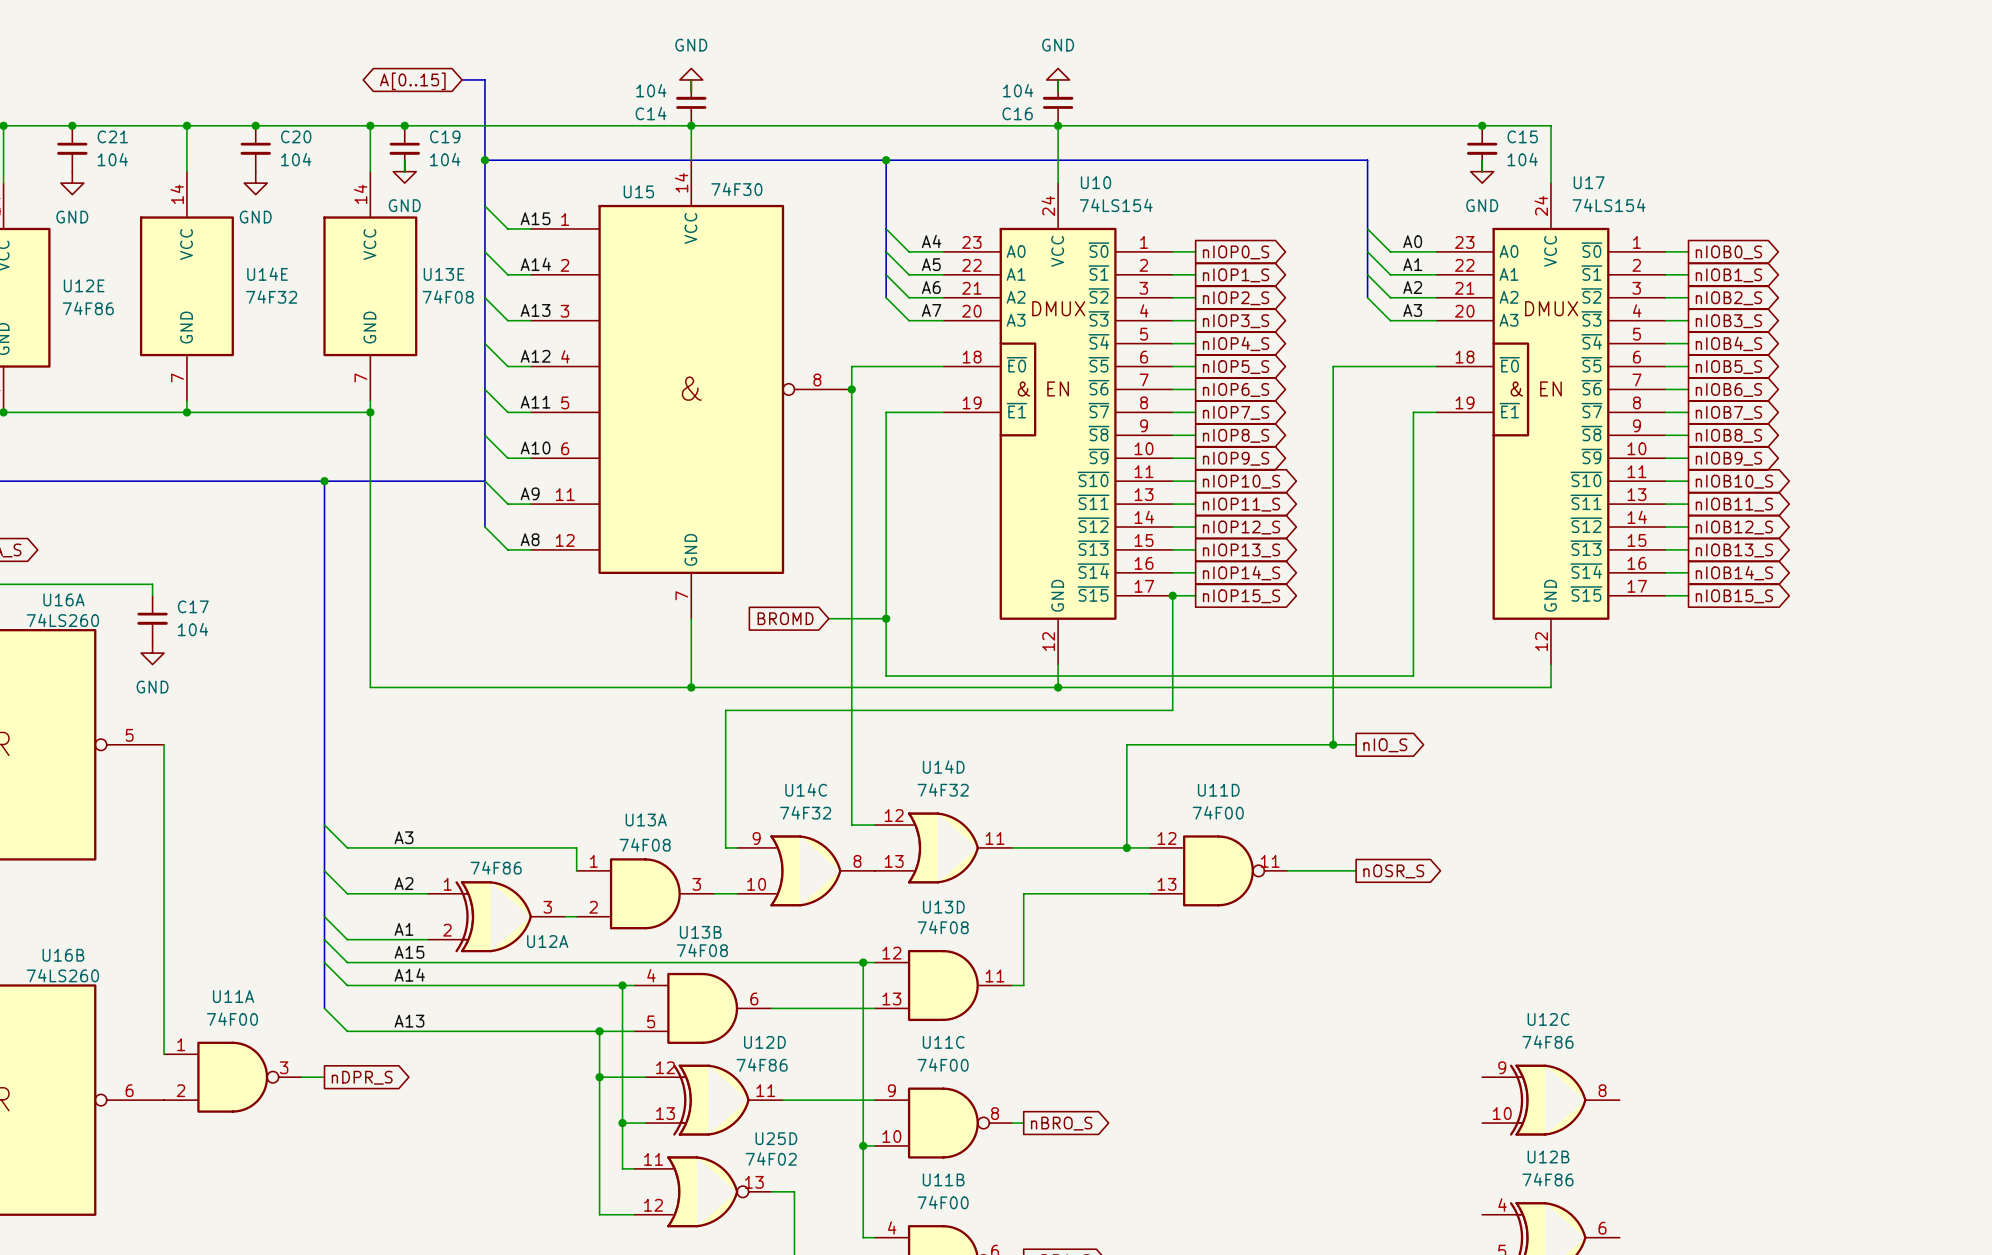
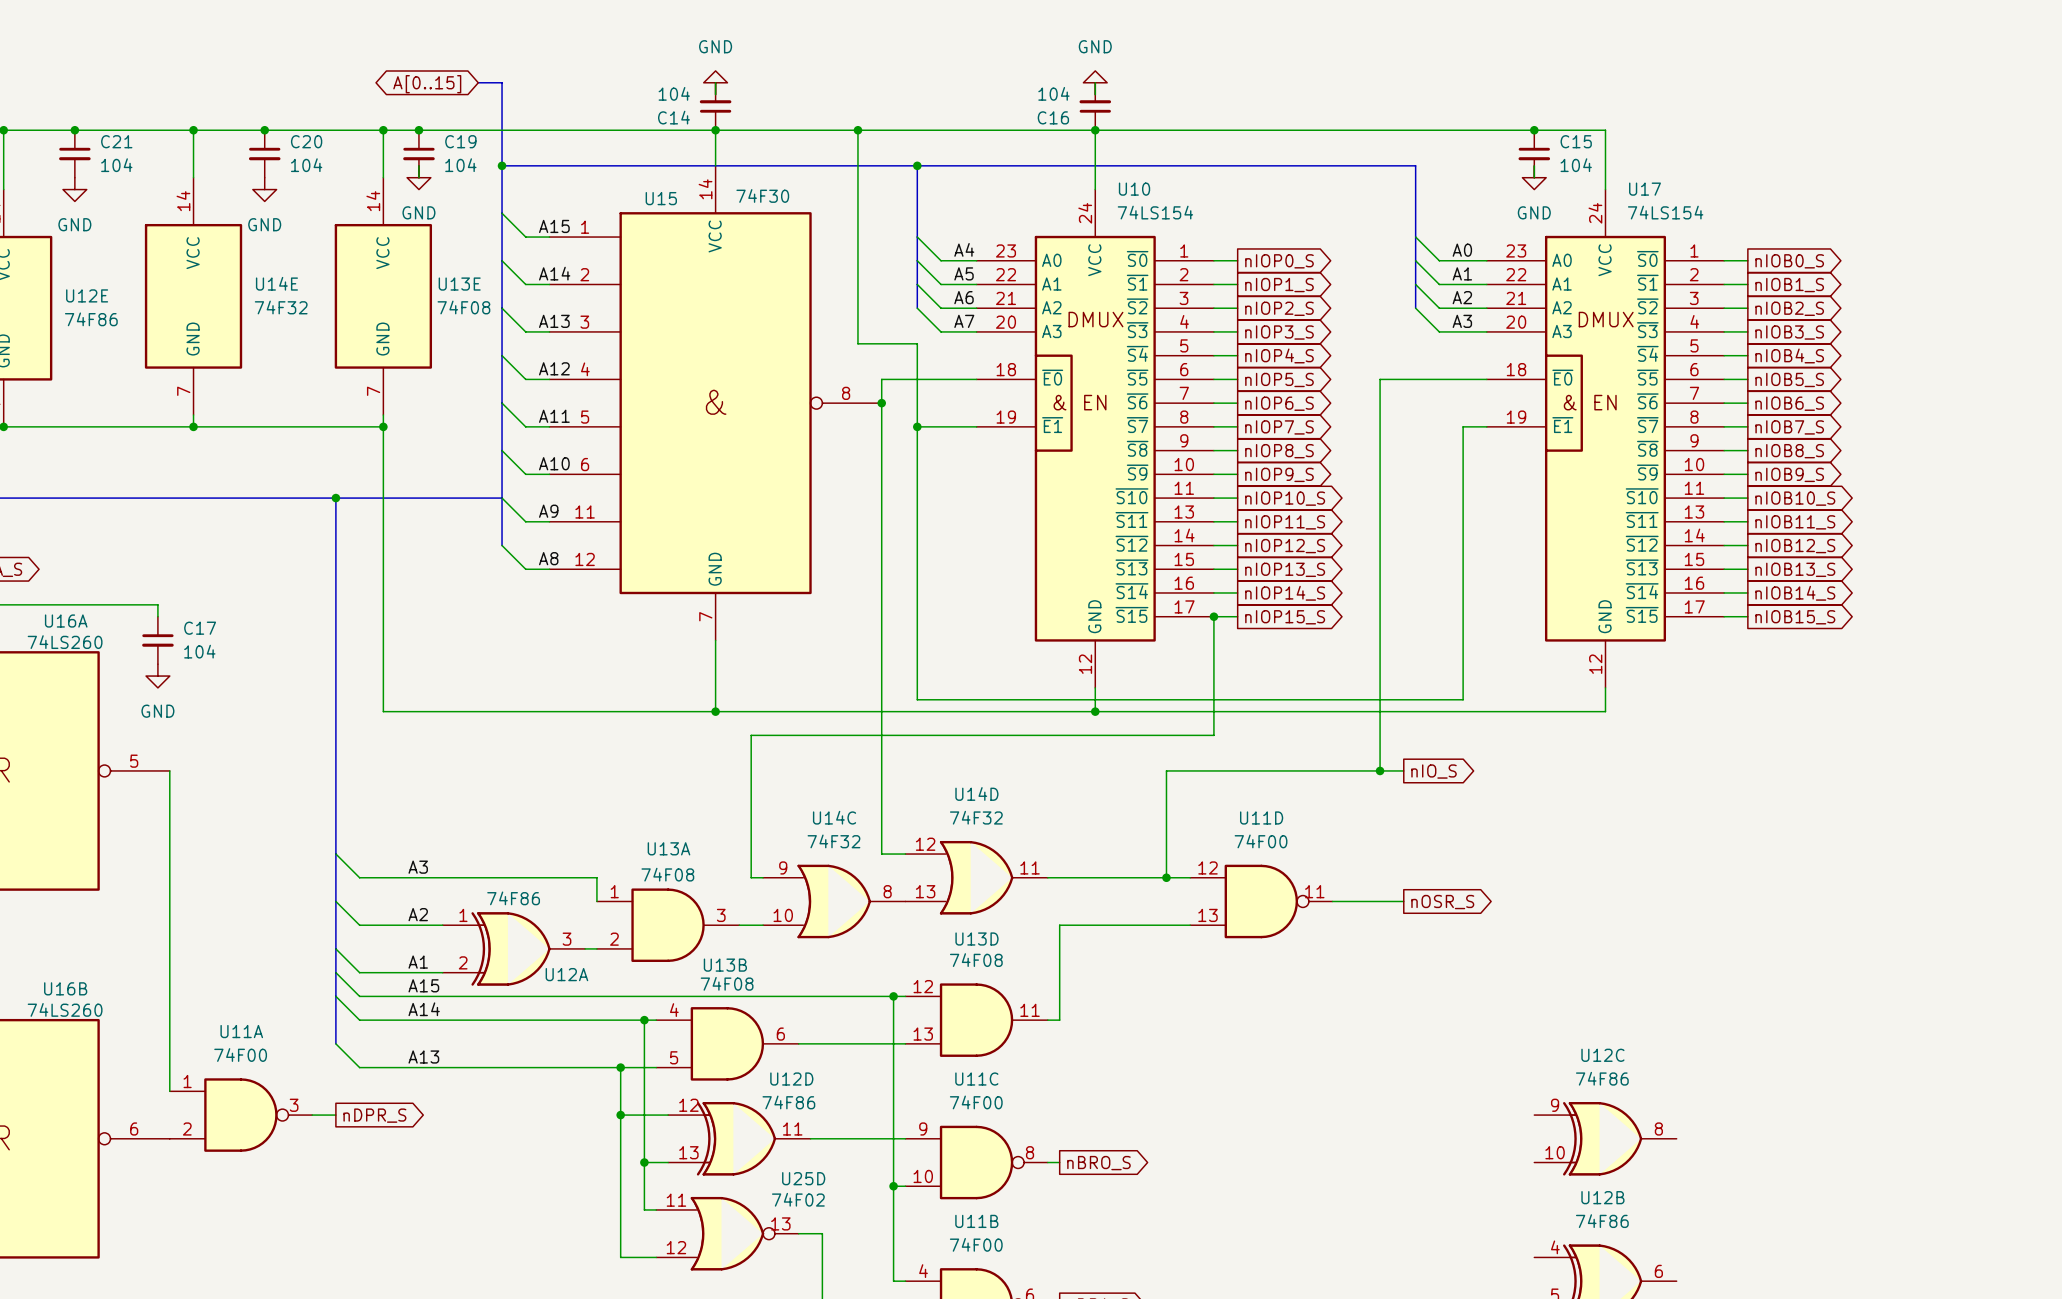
wire: none -> (857, 130) (857, 343) (917, 343) (917, 426)
junction: none -> (857, 130)
junction: none -> (917, 426)
global label: BROMD (785, 618) -> none
wire: (828, 618) (886, 618) -> none
junction: (886, 618) -> none

